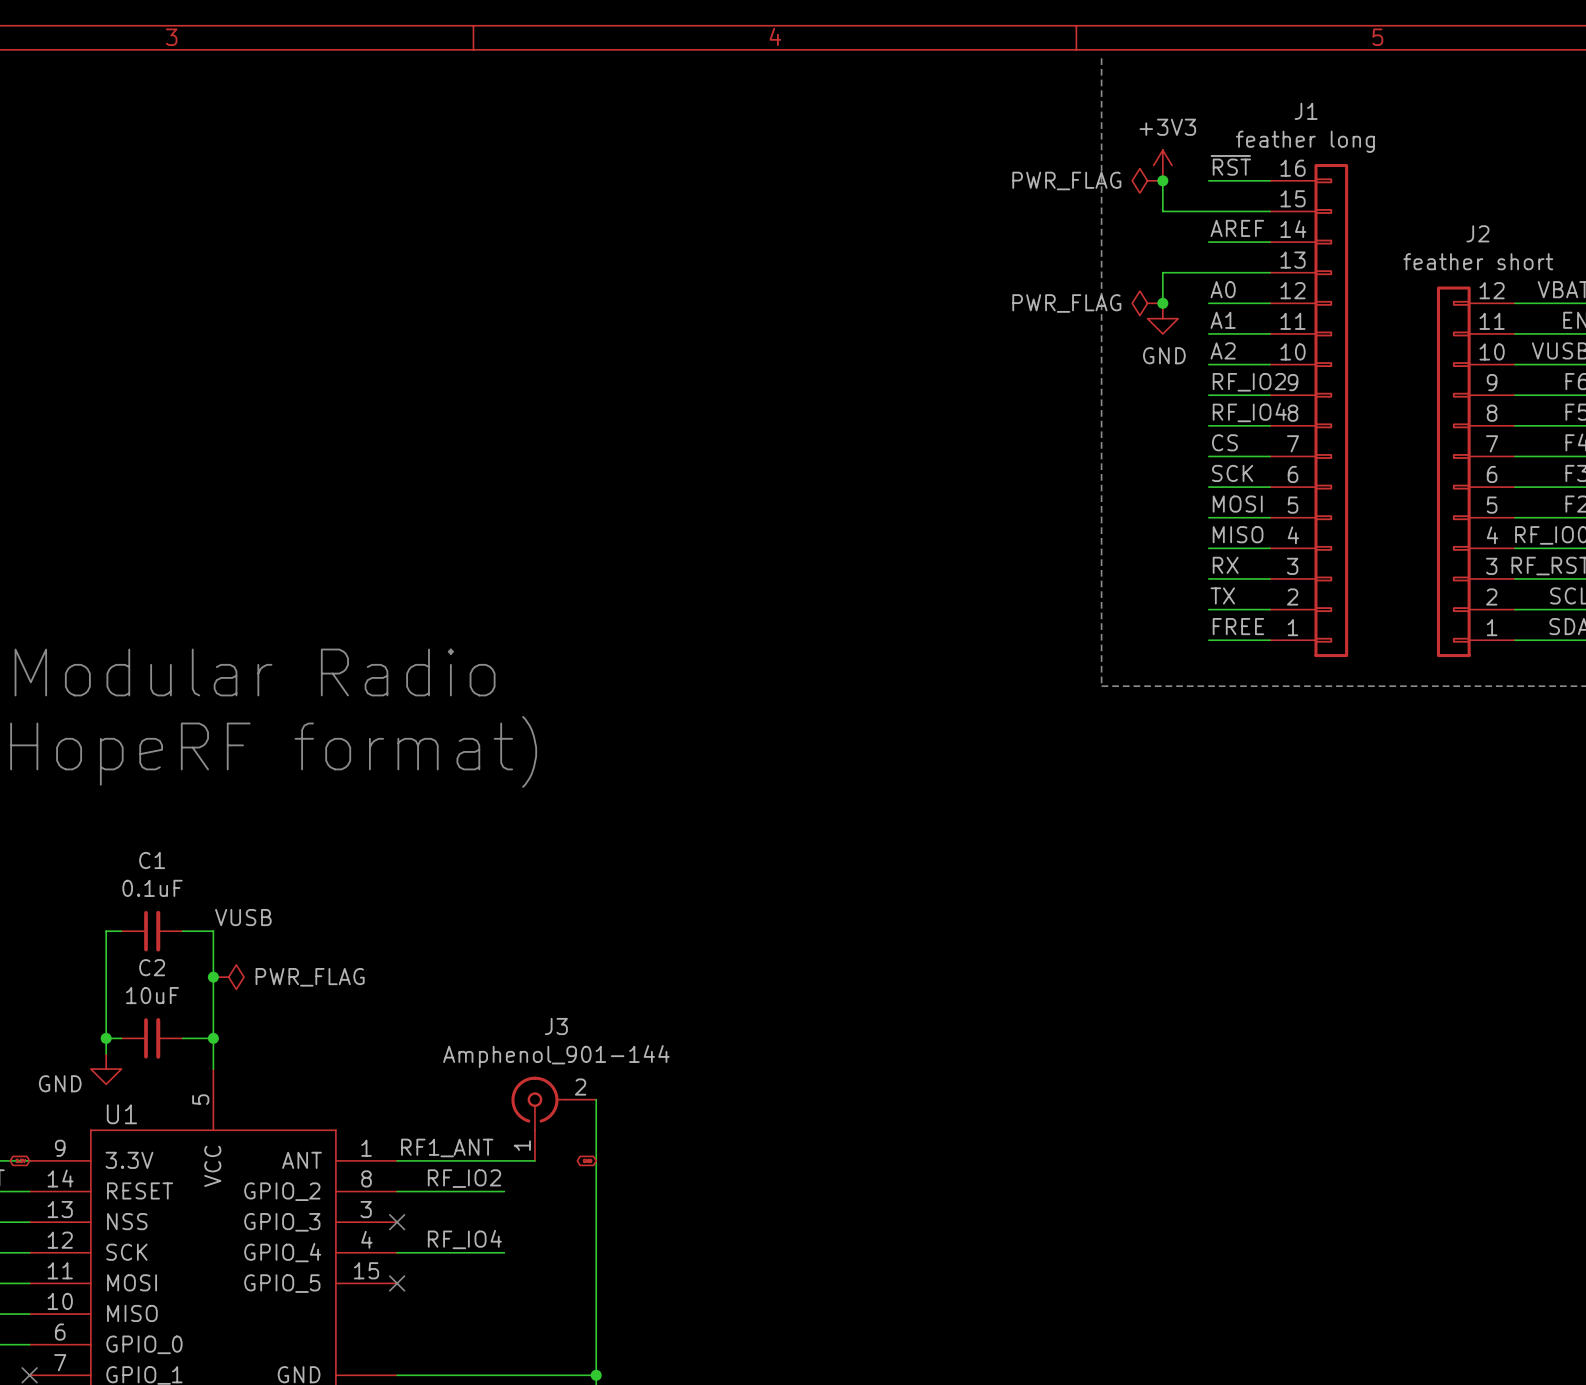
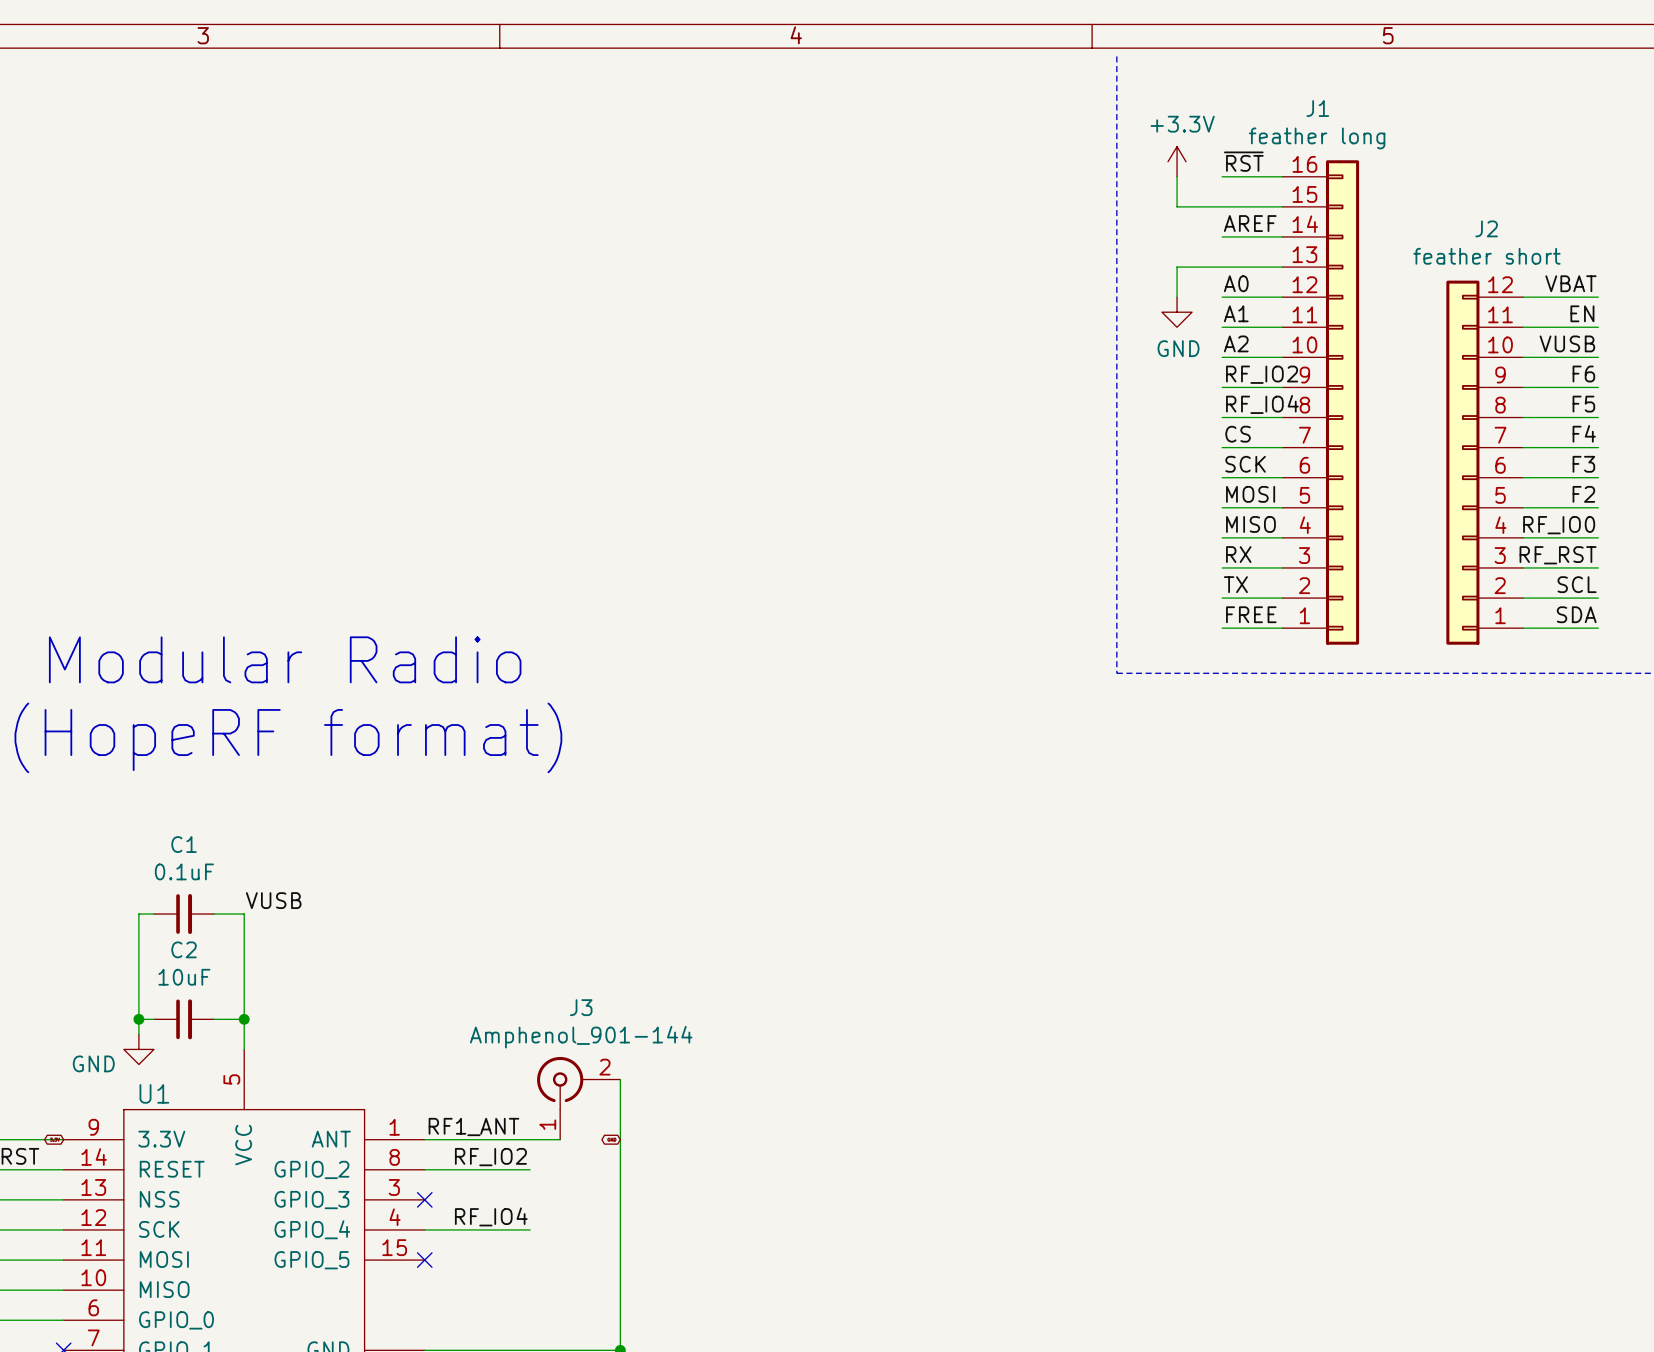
power symbol: +3V3 (1162, 165) -> +3.3V (1177, 161)
power symbol: PWR_FLAG (1147, 180) -> none
junction: (1162, 180) -> none
power symbol: PWR_FLAG (1147, 303) -> none
junction: (1162, 303) -> none
junction: (213, 977) -> none
power symbol: PWR_FLAG (228, 977) -> none

